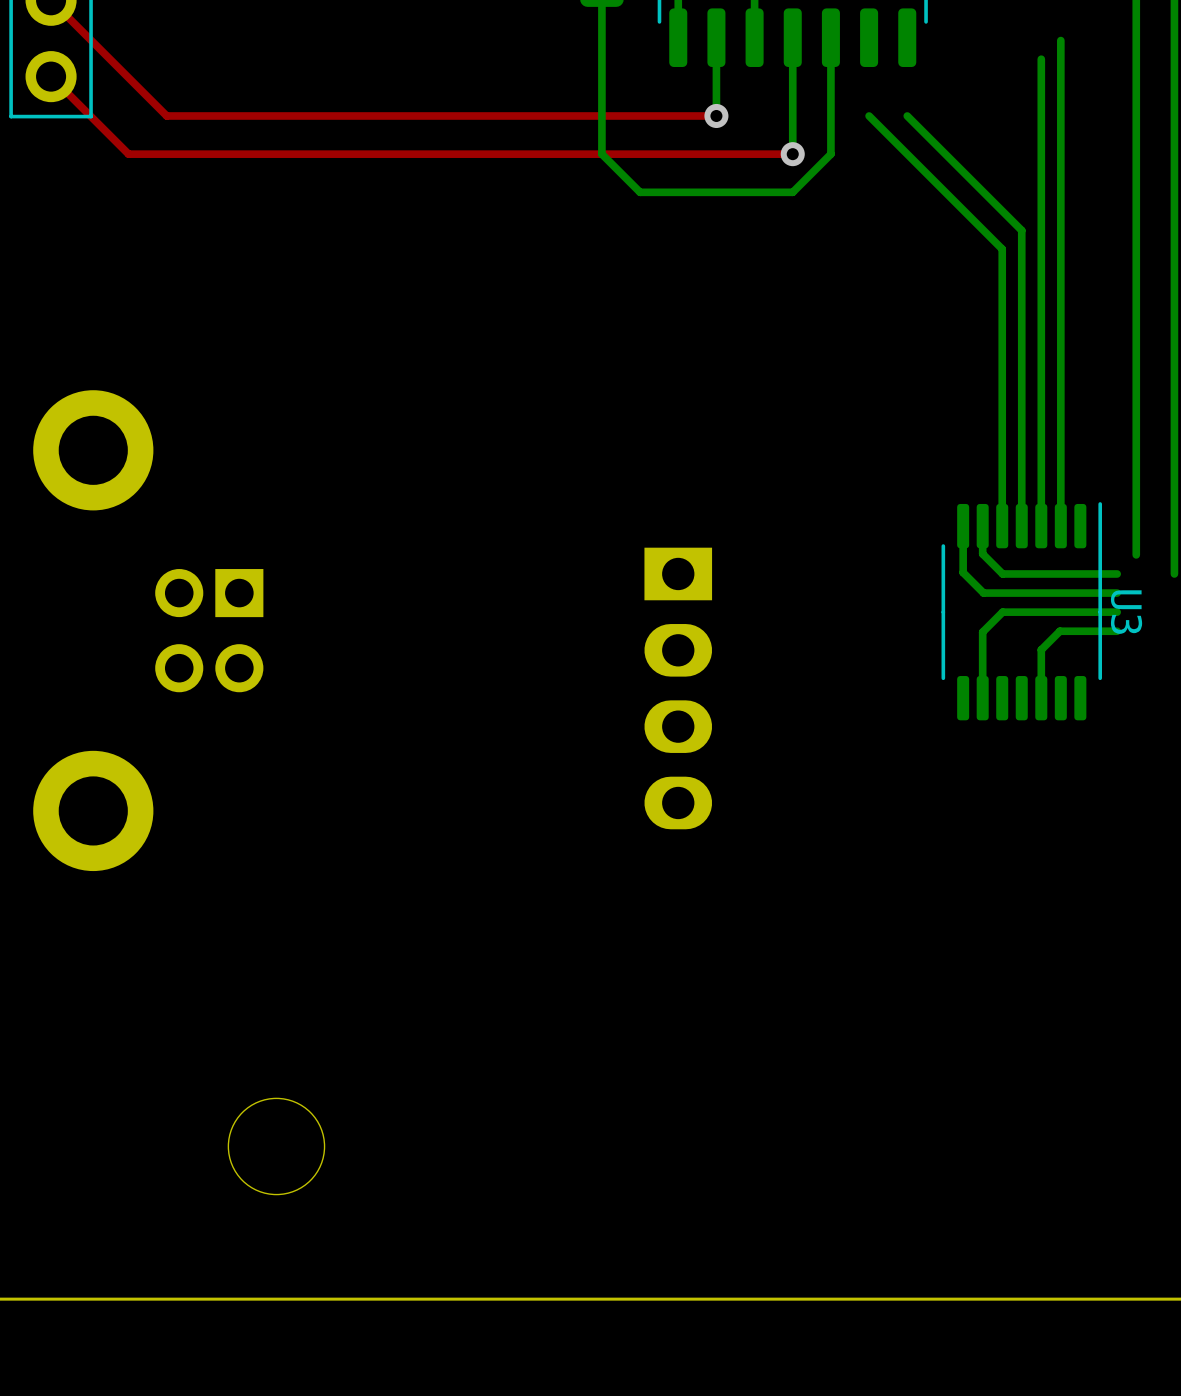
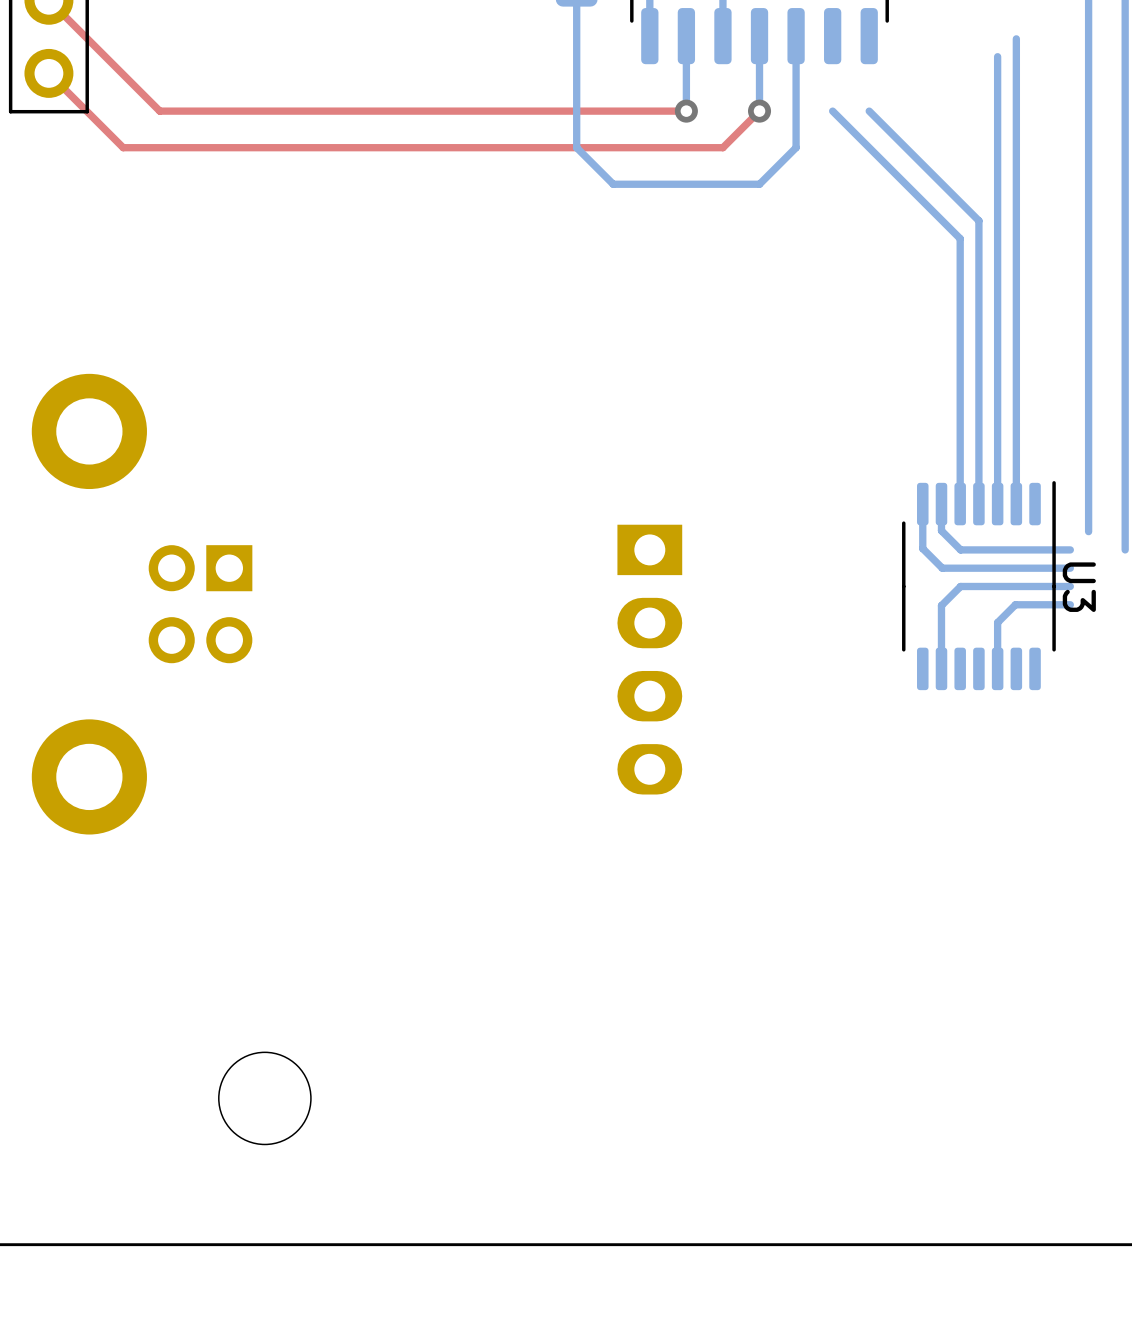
bottom track: (792, 115) (792, 154) -> none
top track: (792, 154) (754, 154) -> (759, 111) (722, 147)
via position: (792, 154) -> (759, 111)

